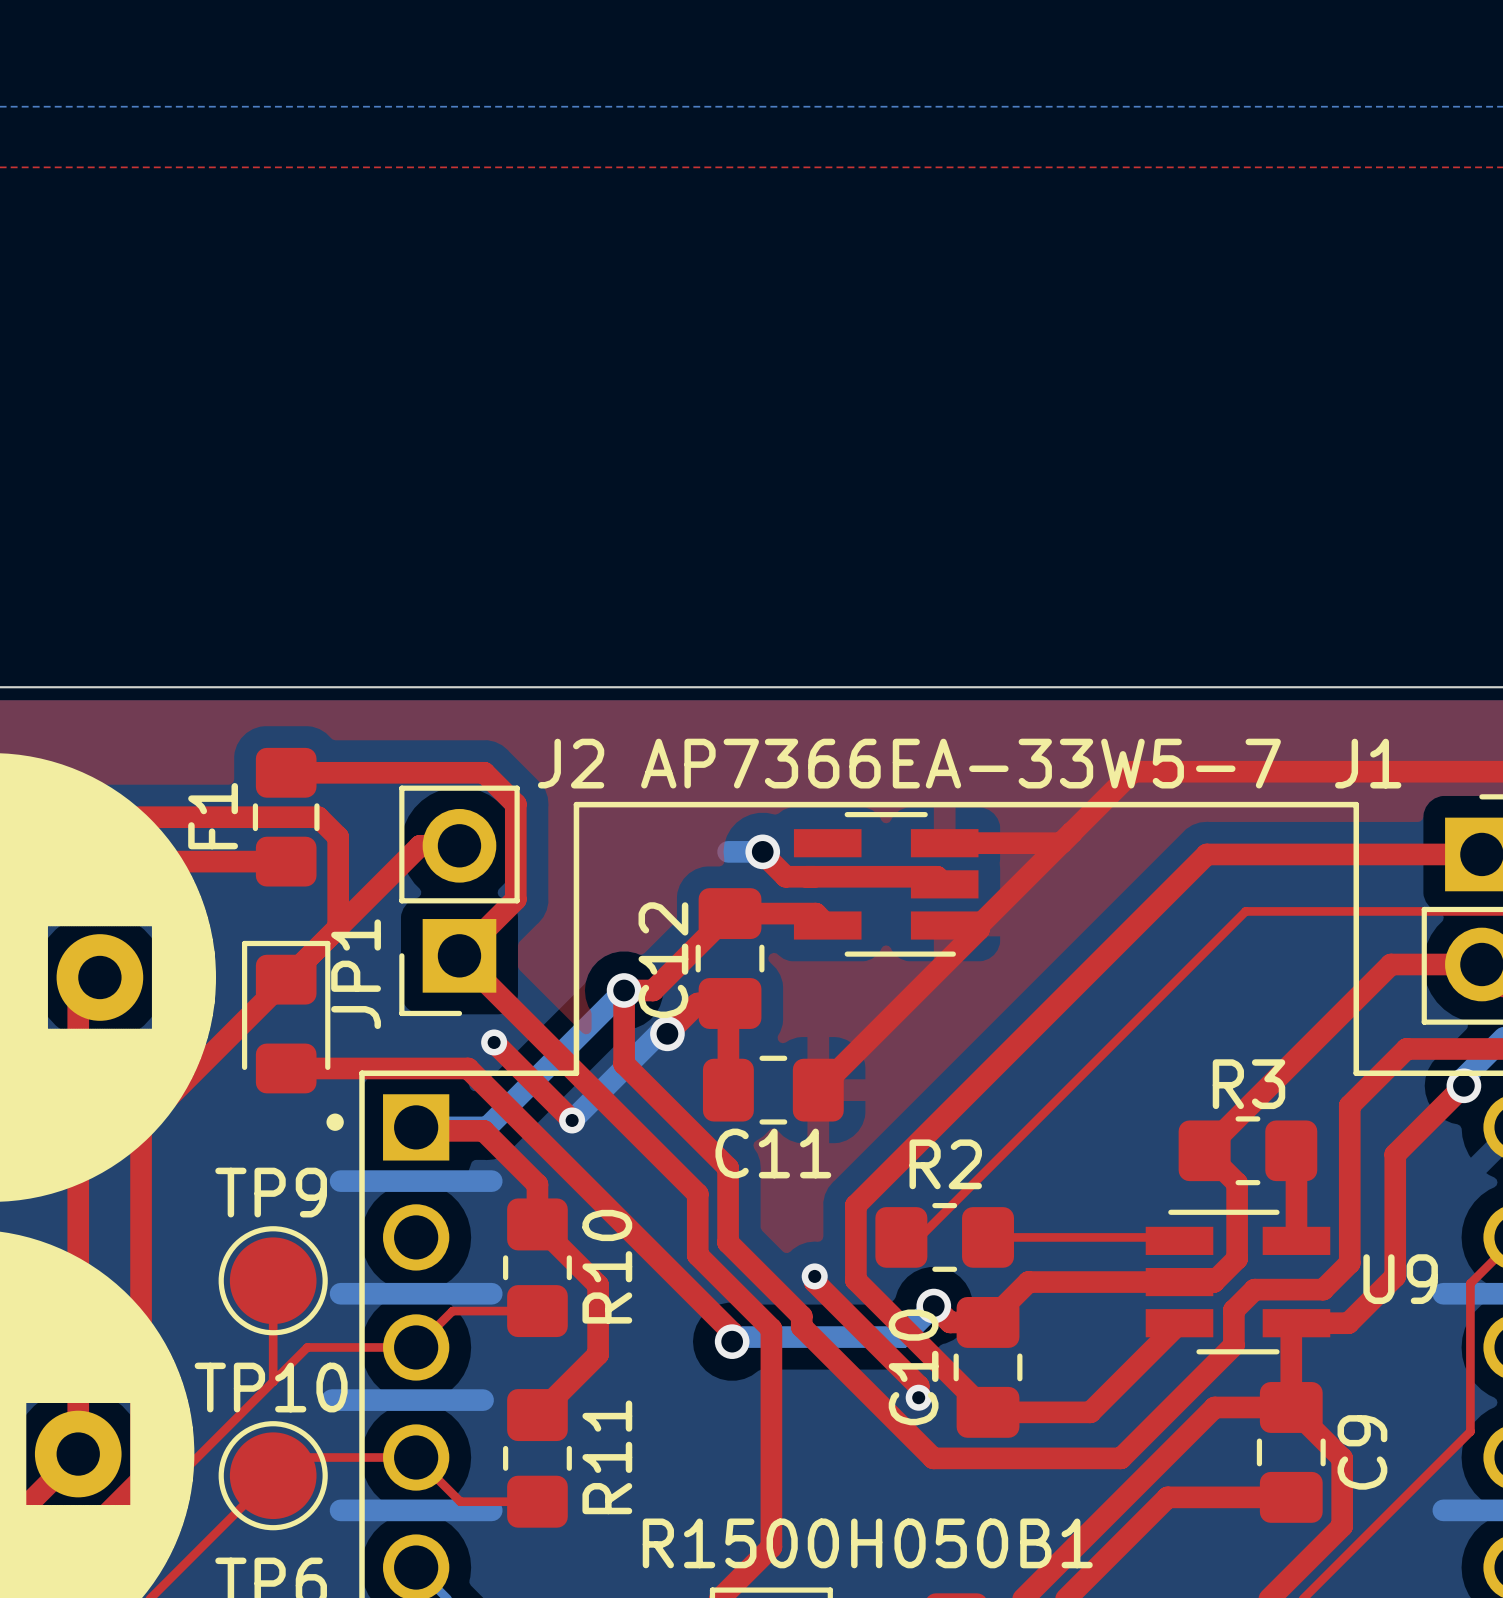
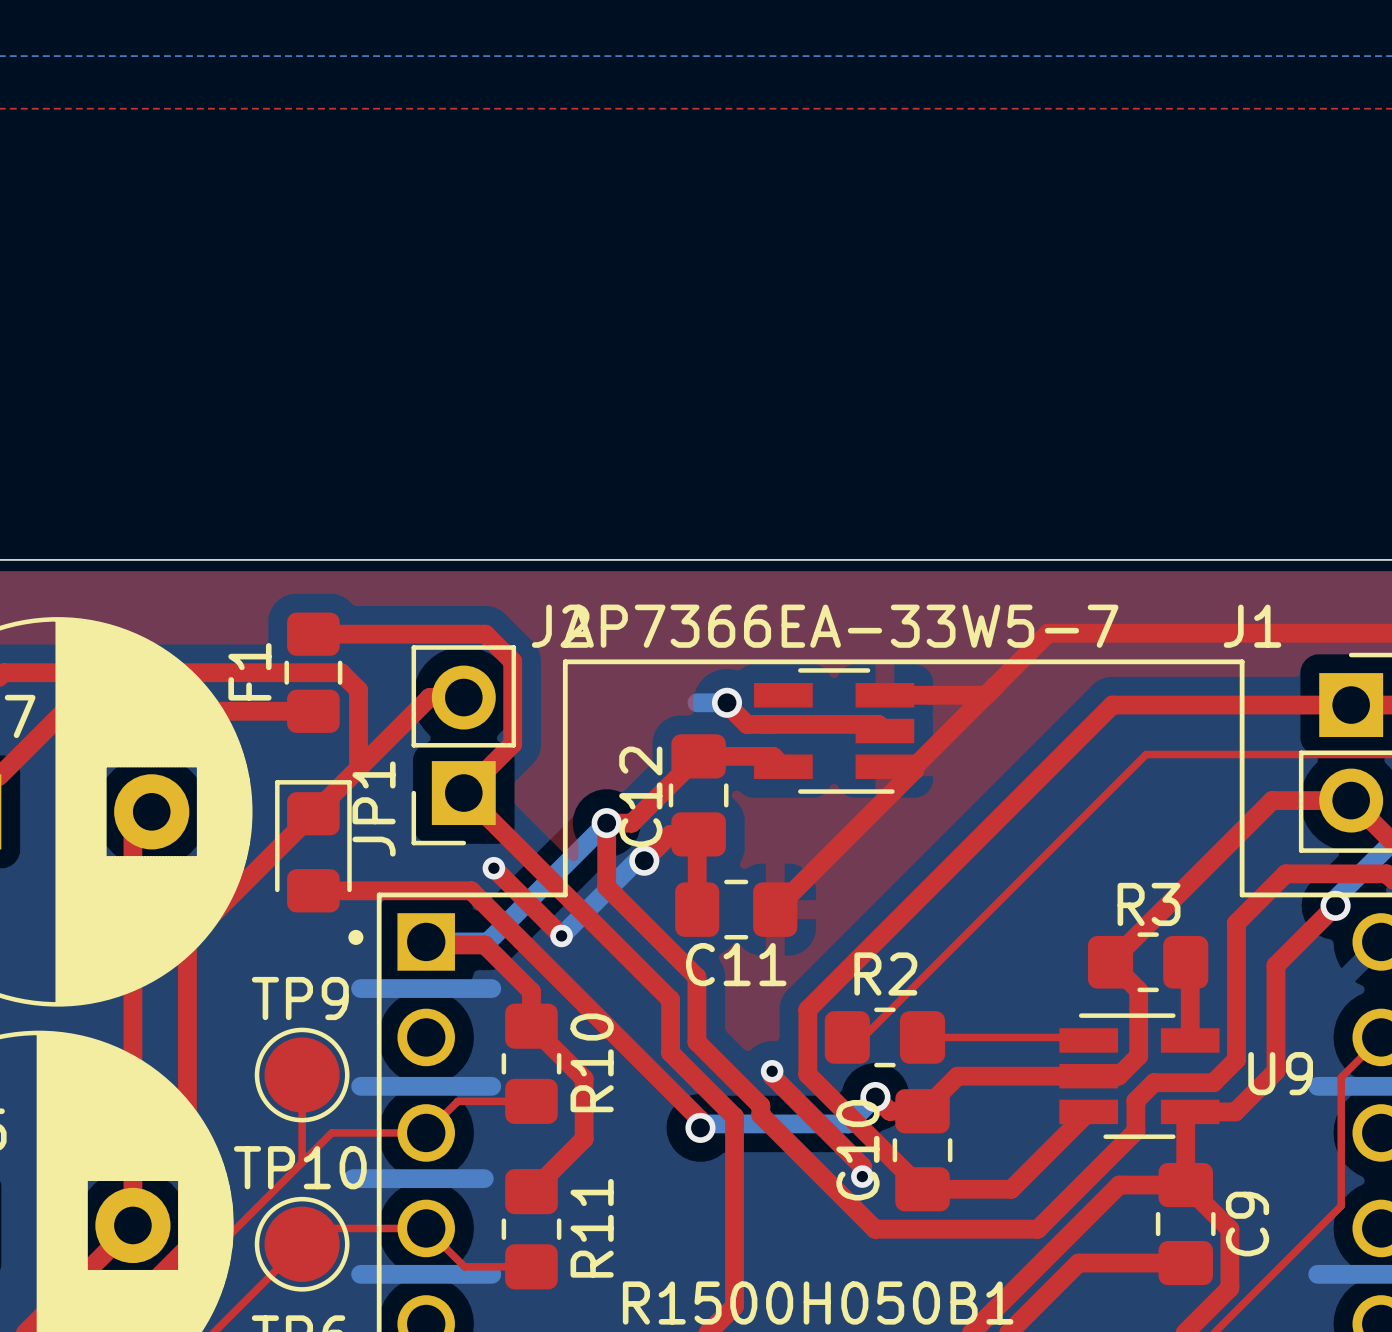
AP7366EA-33W5-7 name position: AP7366EA-33W5-7 (960, 763) -> AP7366EA-33W5-7 (840, 626)

